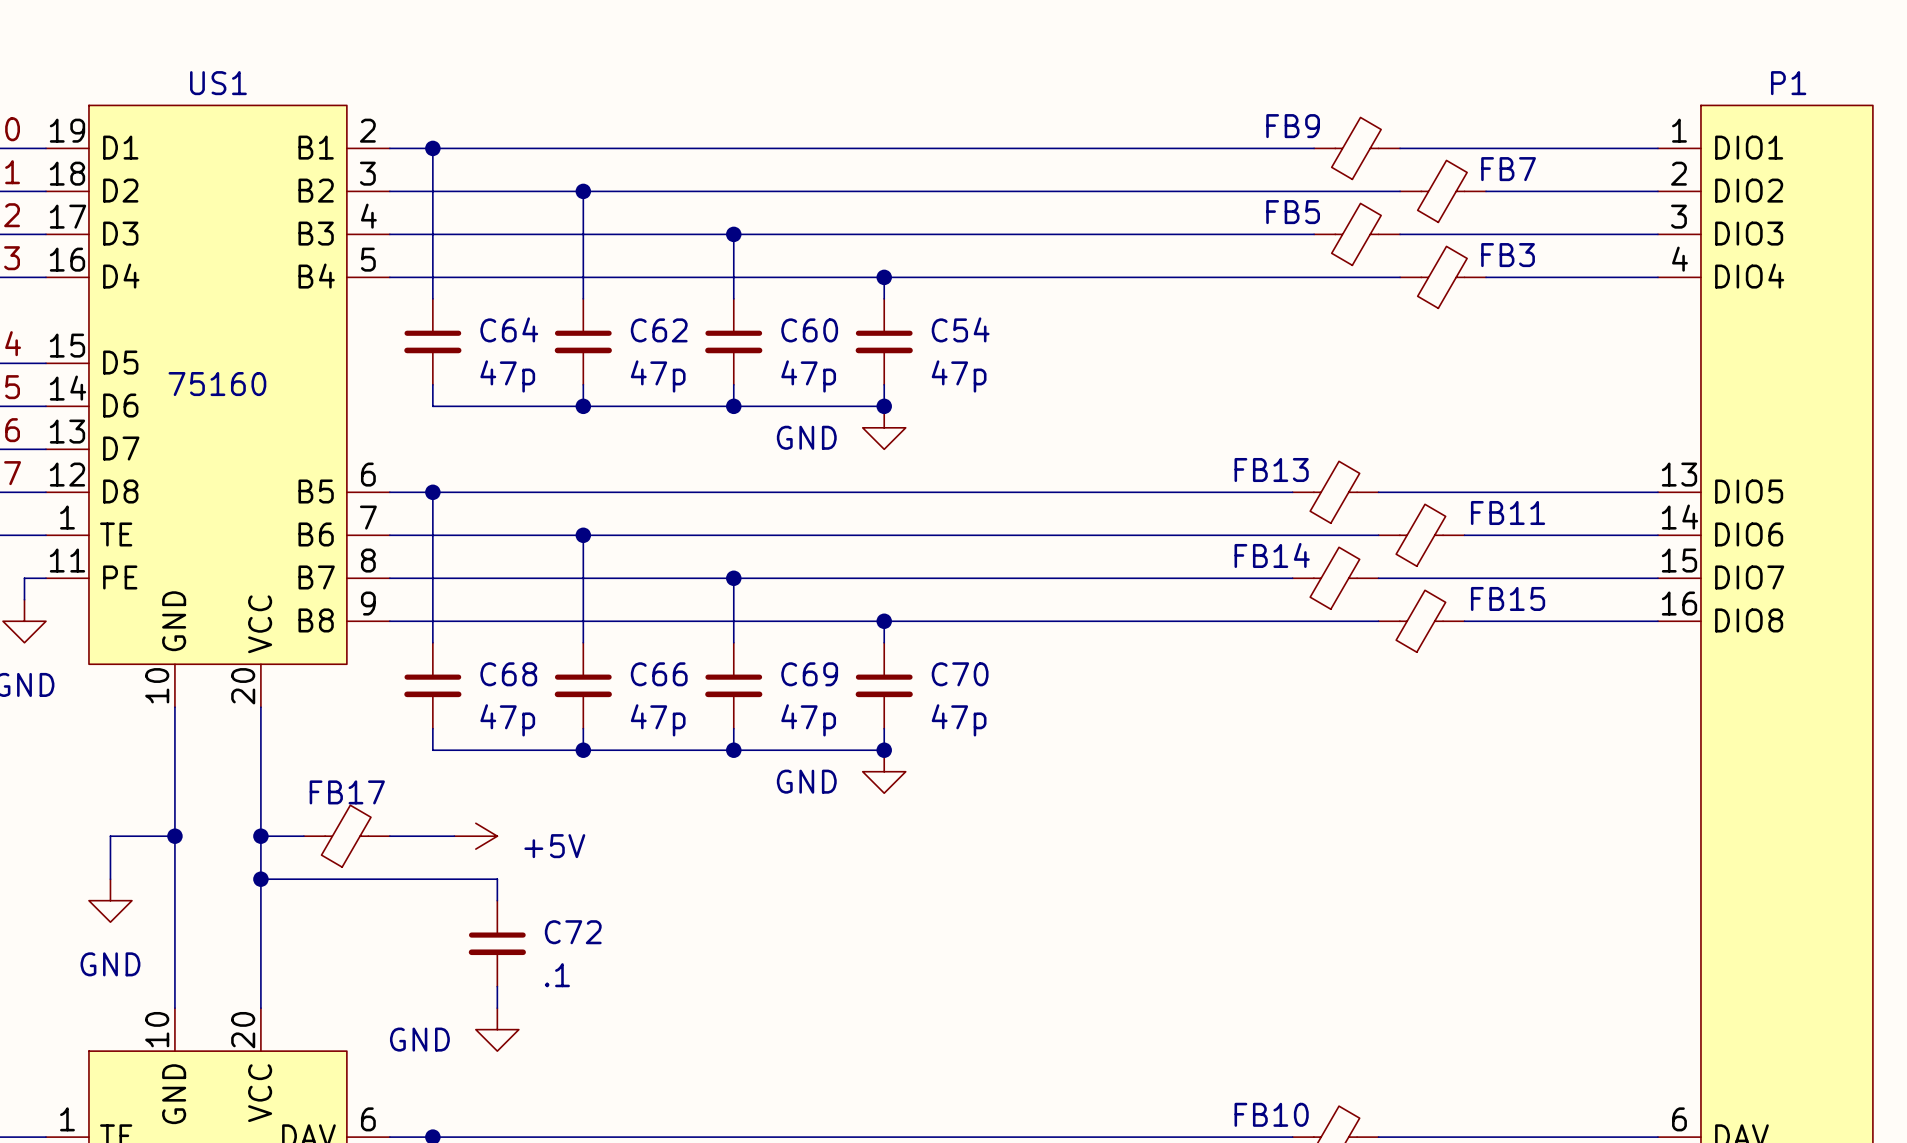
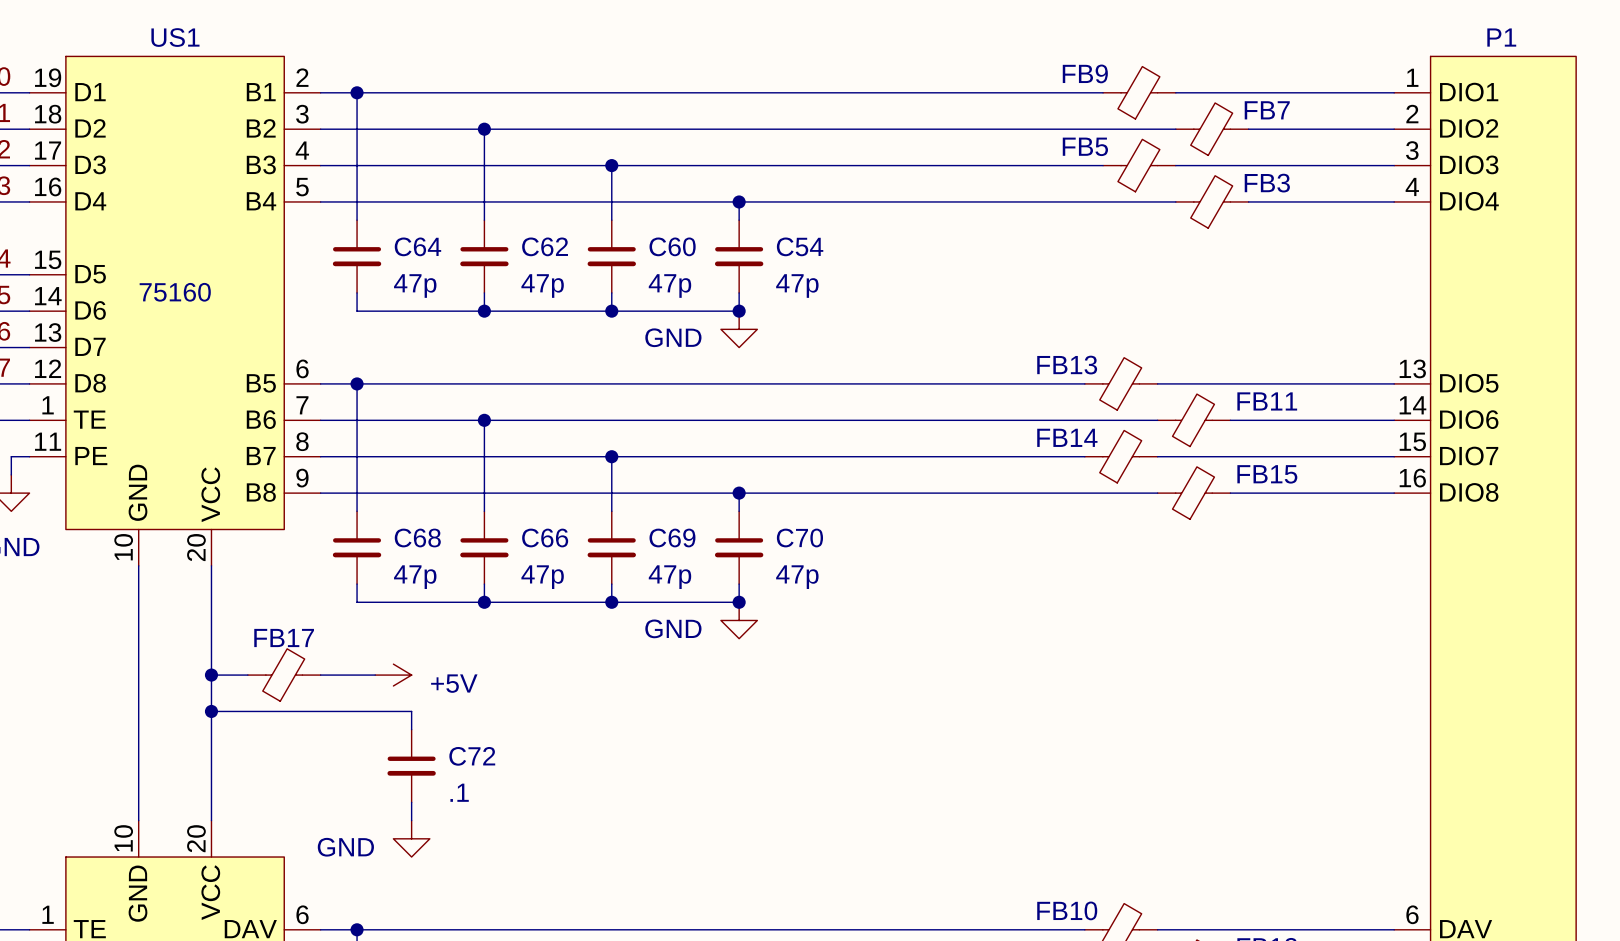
wire: (174, 836) (110, 836) (110, 879) -> none
junction: (174, 836) -> none
power symbol: GND (110, 900) -> none

